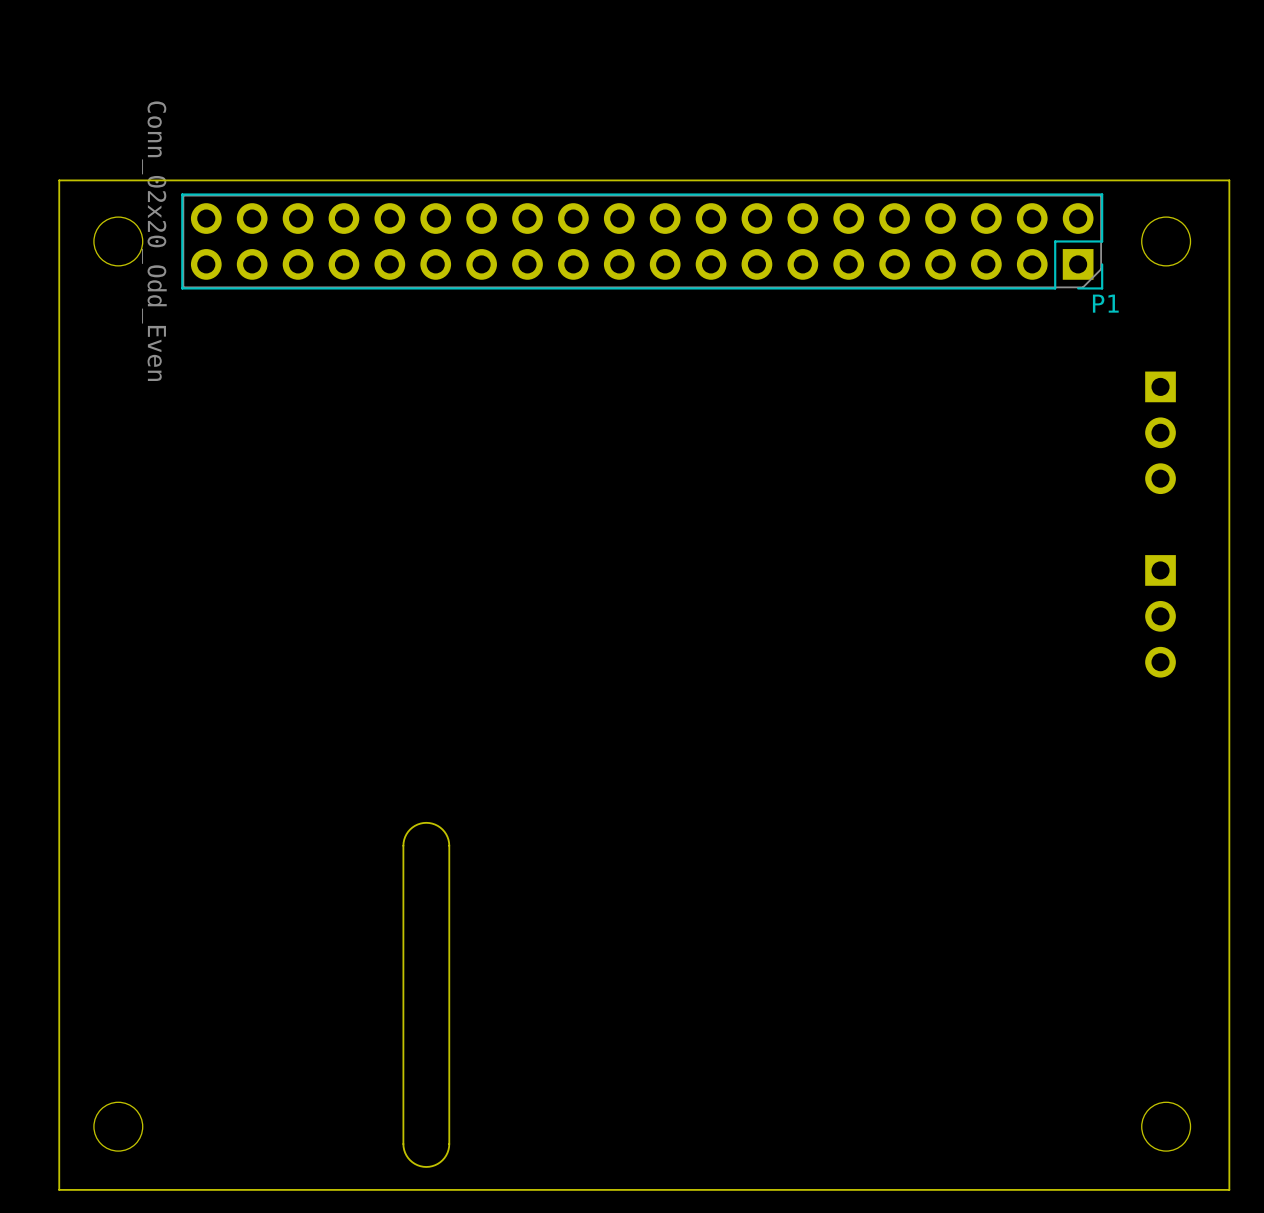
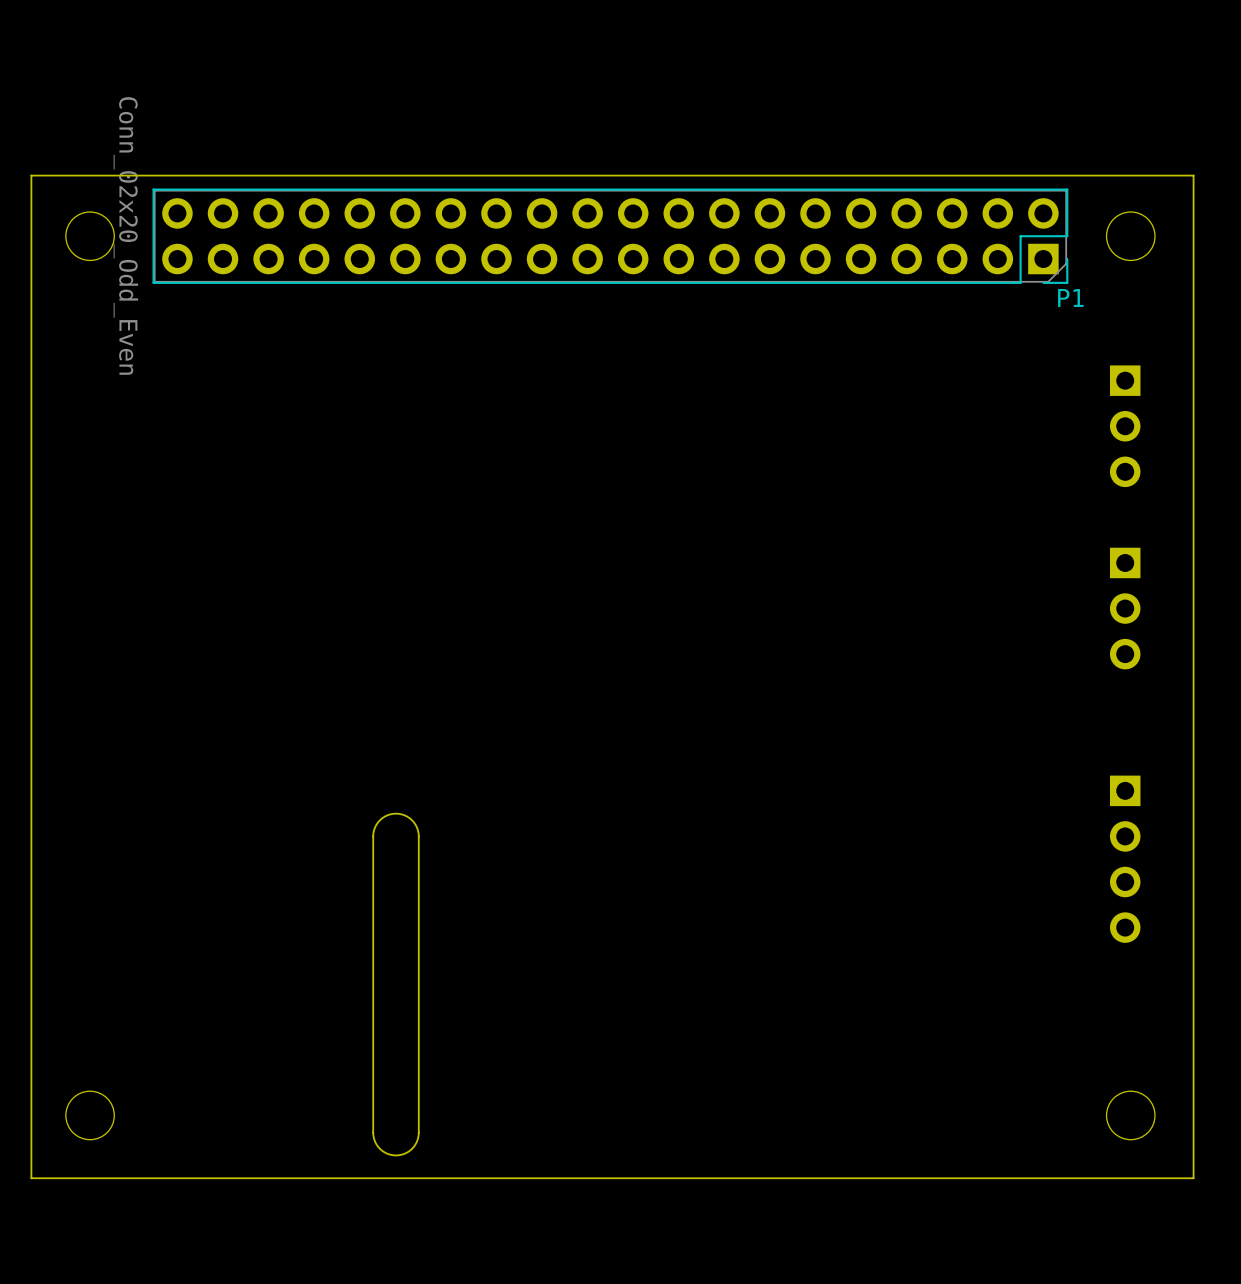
part: none -> (1125, 859)

